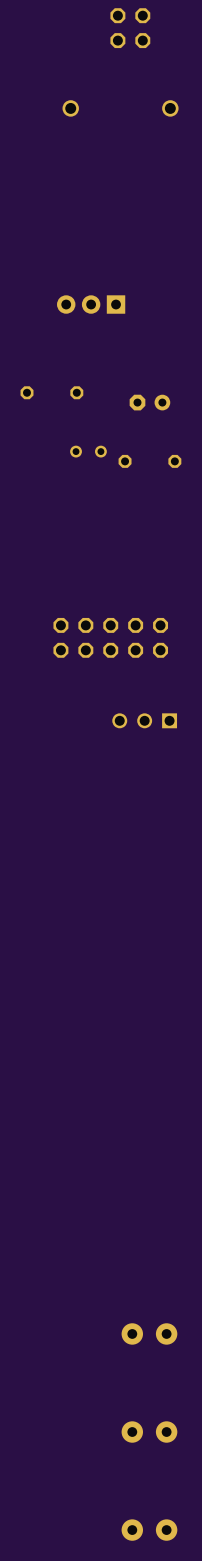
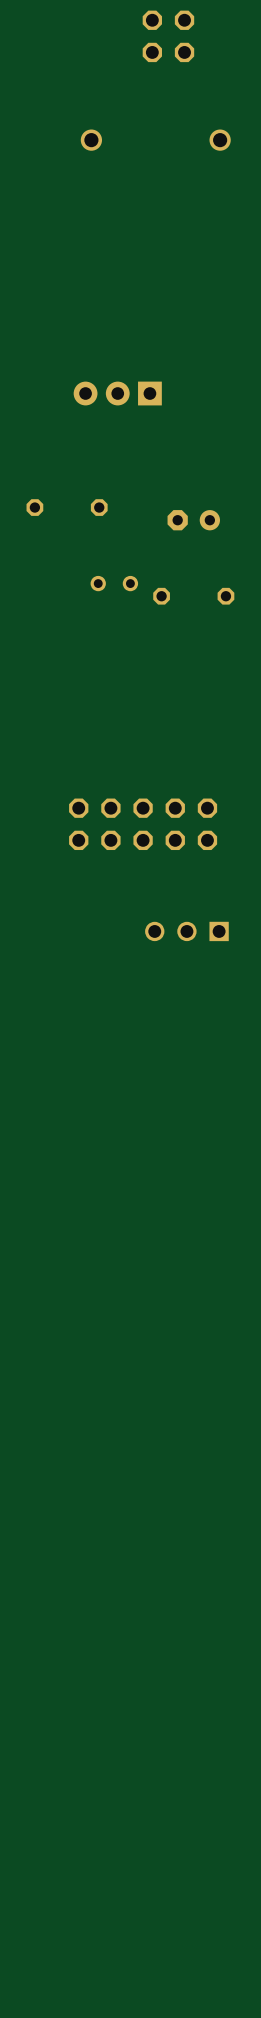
part: (149, 1333) -> none
part: (149, 1432) -> none
part: (149, 1530) -> none

